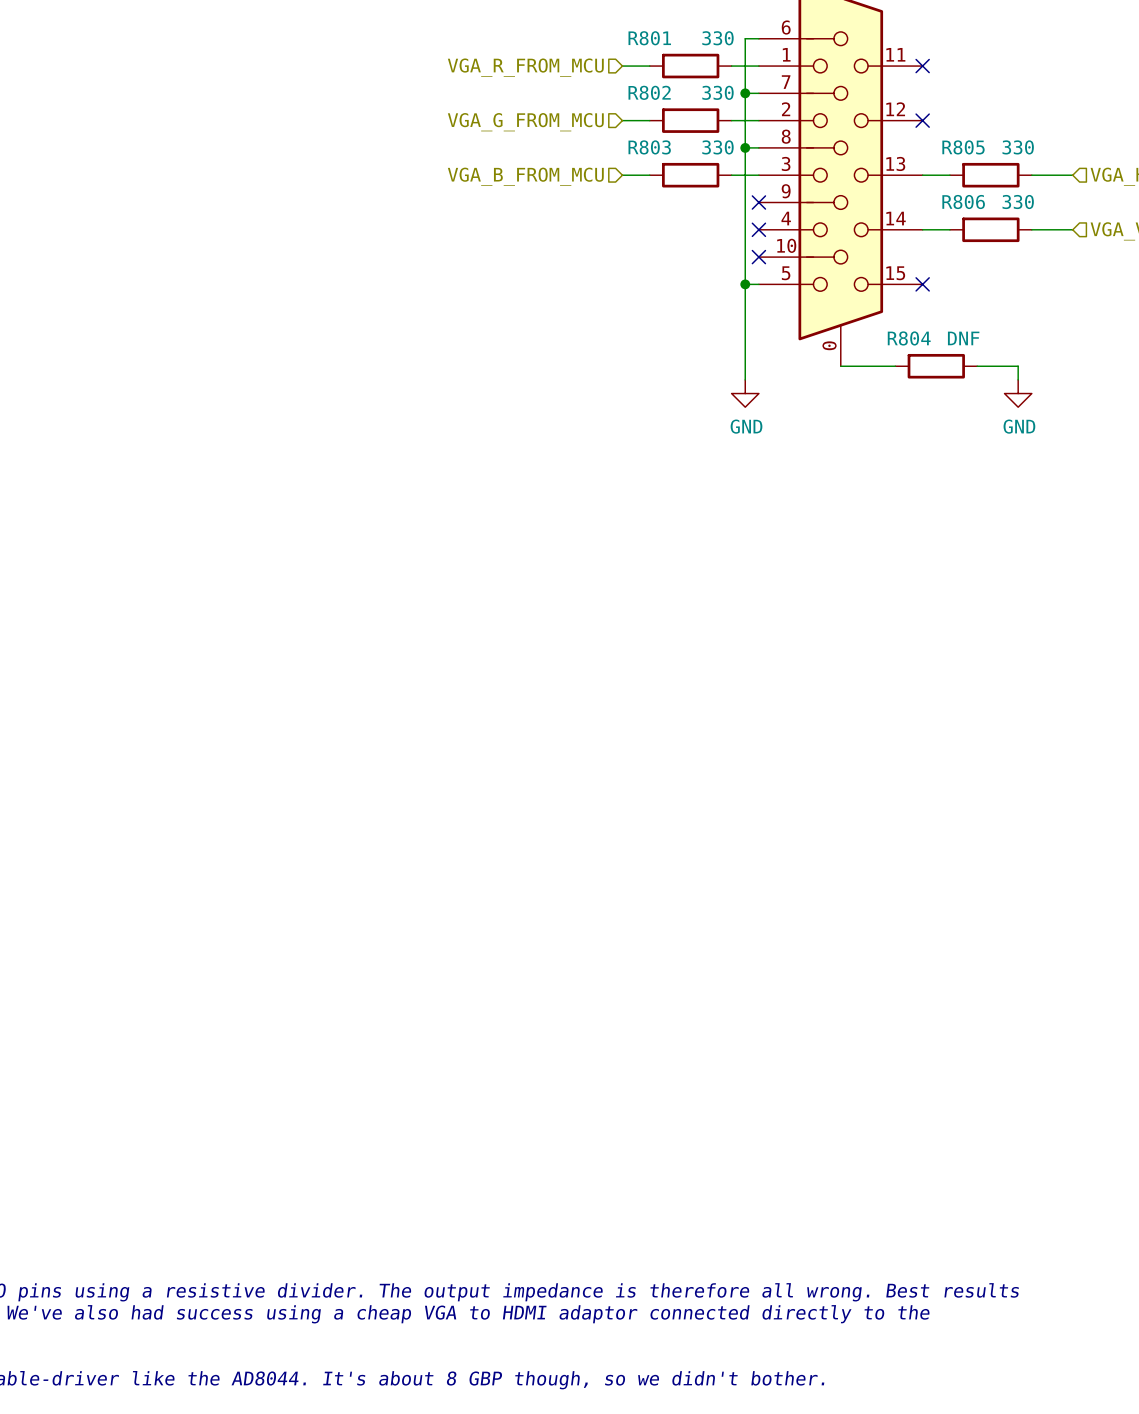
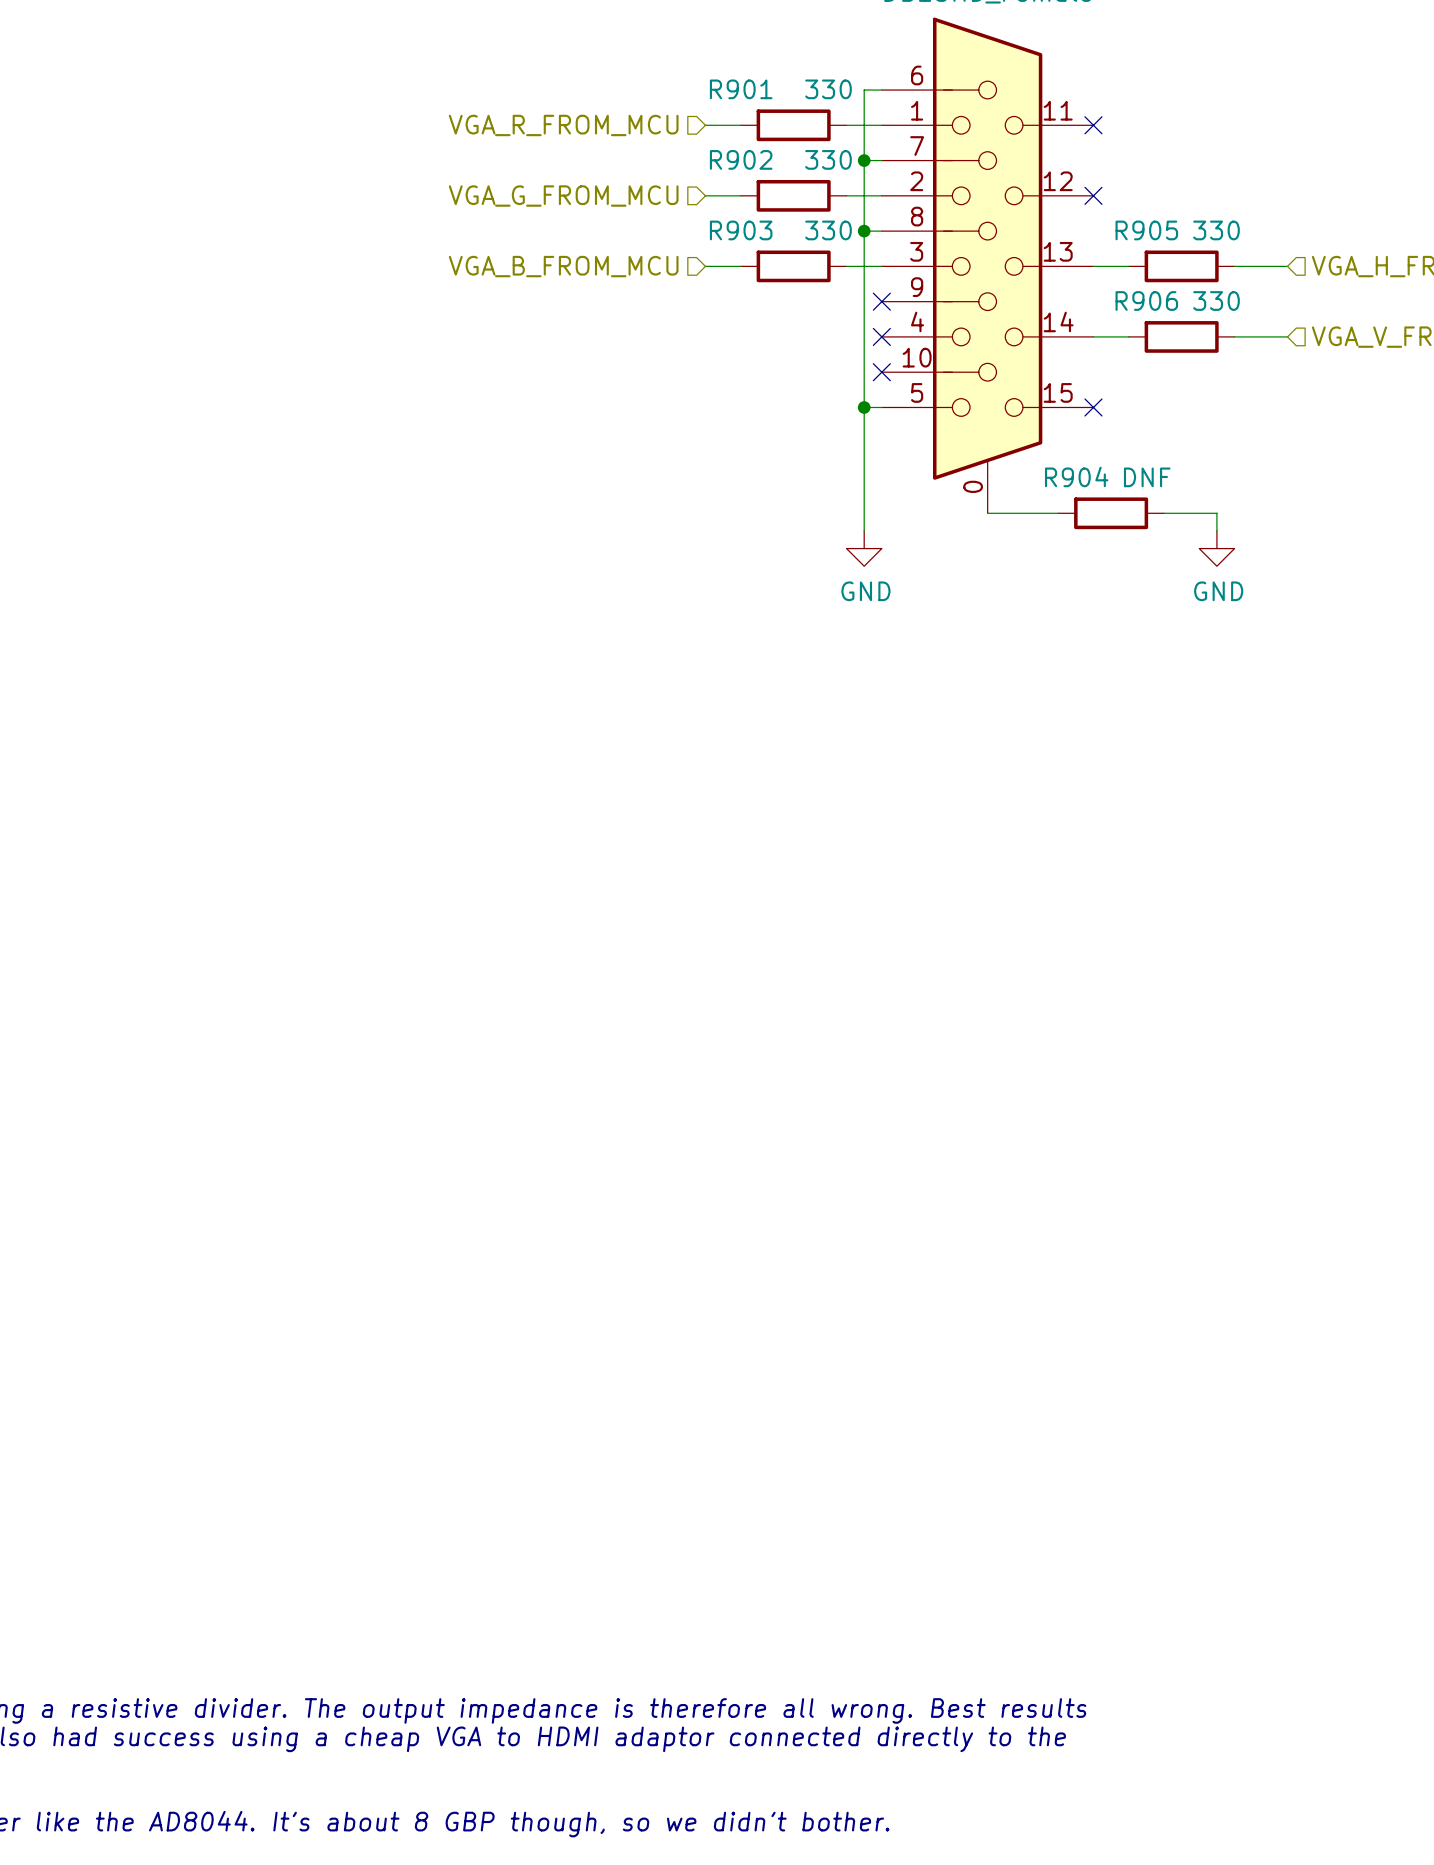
R801 name: R801 (649, 38) -> R901 (741, 89)
R802 name: R802 (649, 92) -> R902 (741, 159)
R803 name: R803 (649, 147) -> R903 (741, 230)
R805 name: R805 (963, 147) -> R905 (1146, 230)
R806 name: R806 (963, 202) -> R906 (1146, 301)
R804 name: R804 (909, 338) -> R904 (1076, 476)

